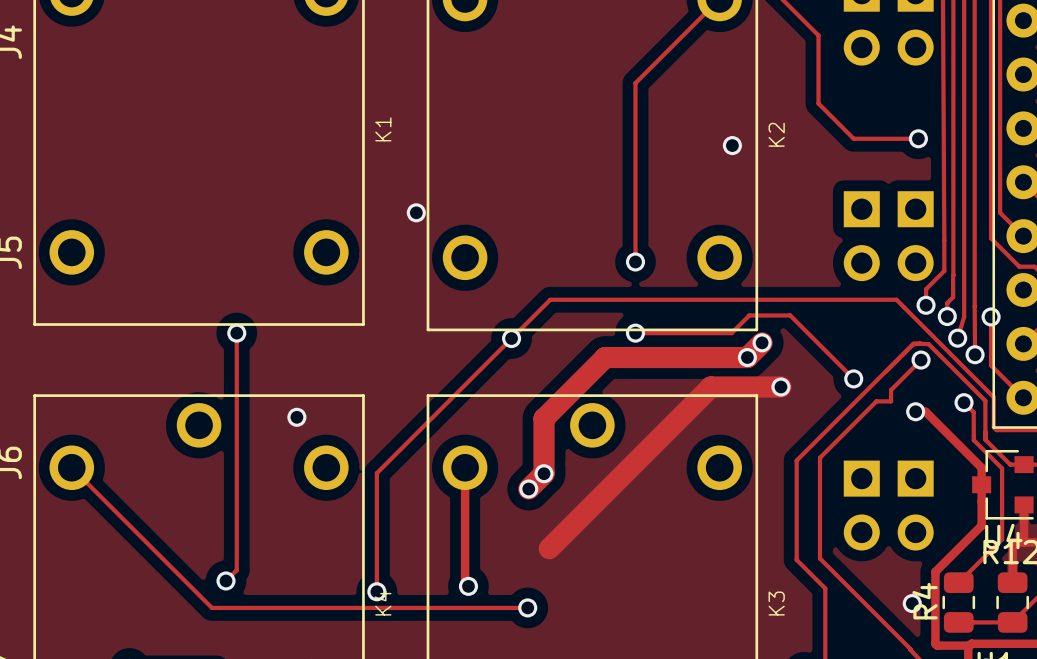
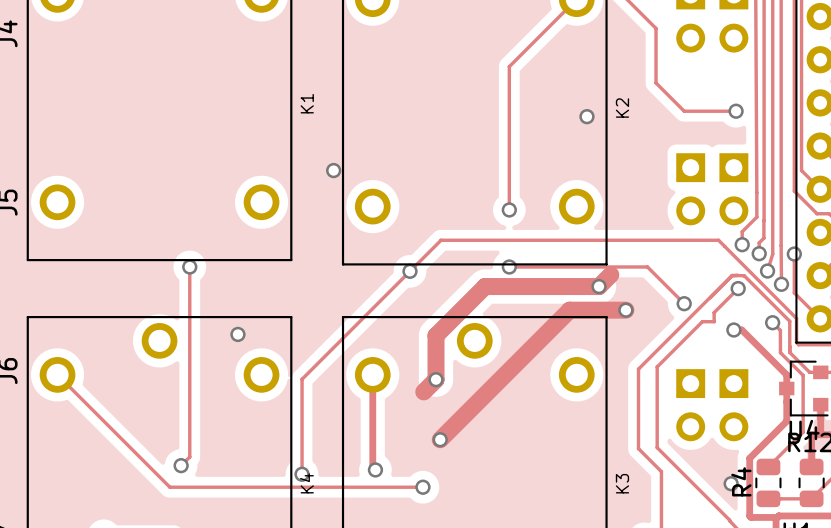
track: (731, 333) (749, 315) (790, 315) (807, 333) -> (586, 266) (647, 266)
via: (762, 342) -> none
via position: (528, 489) -> (440, 439)

